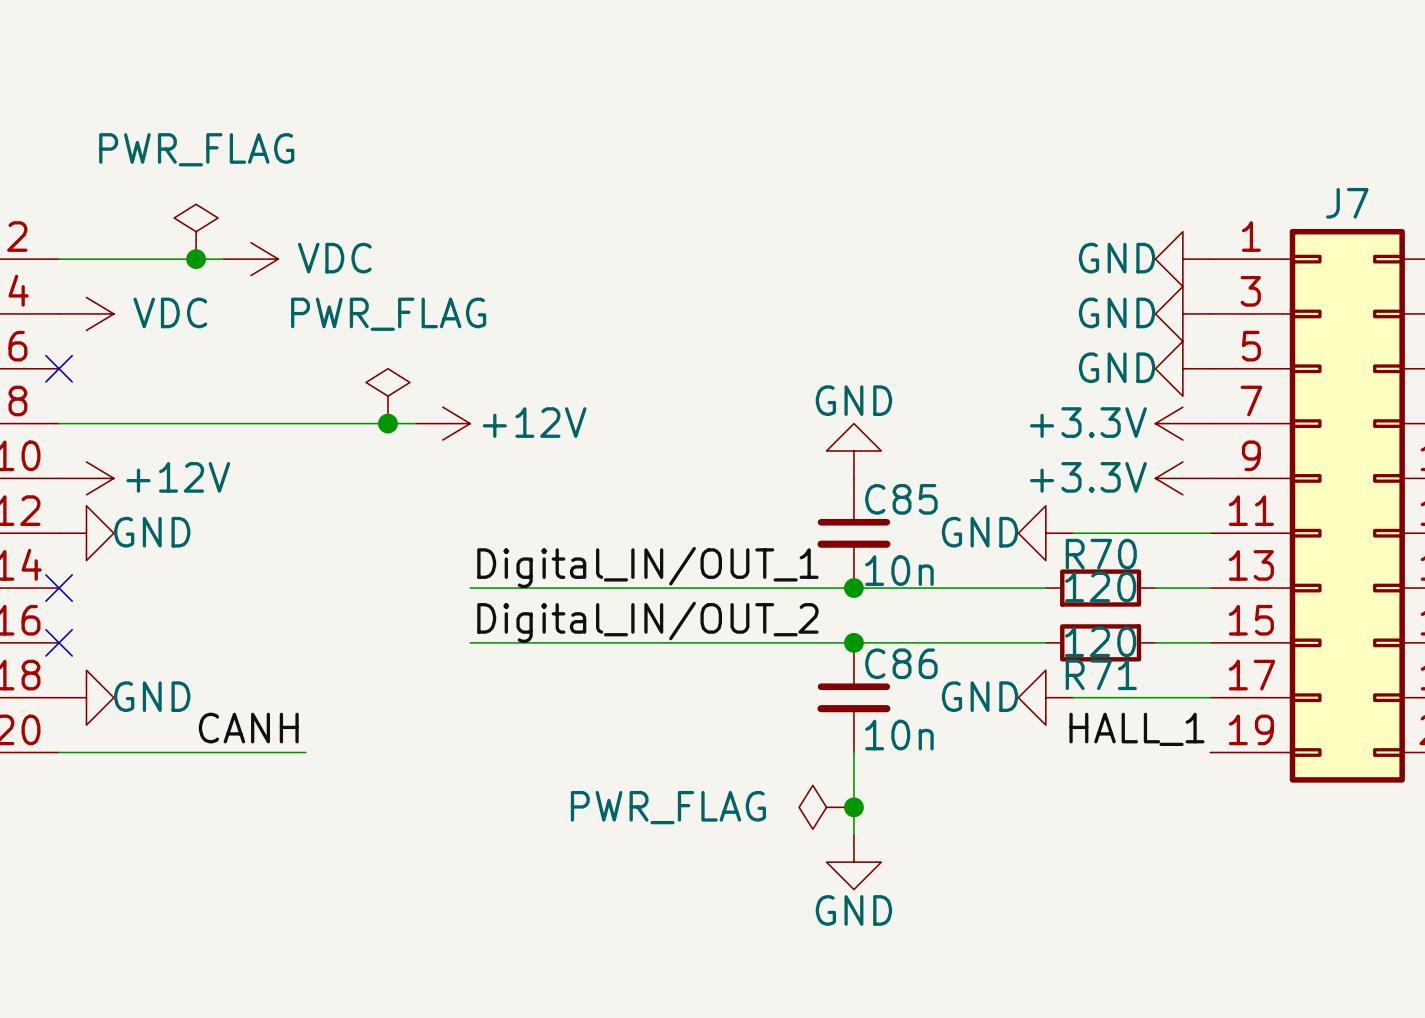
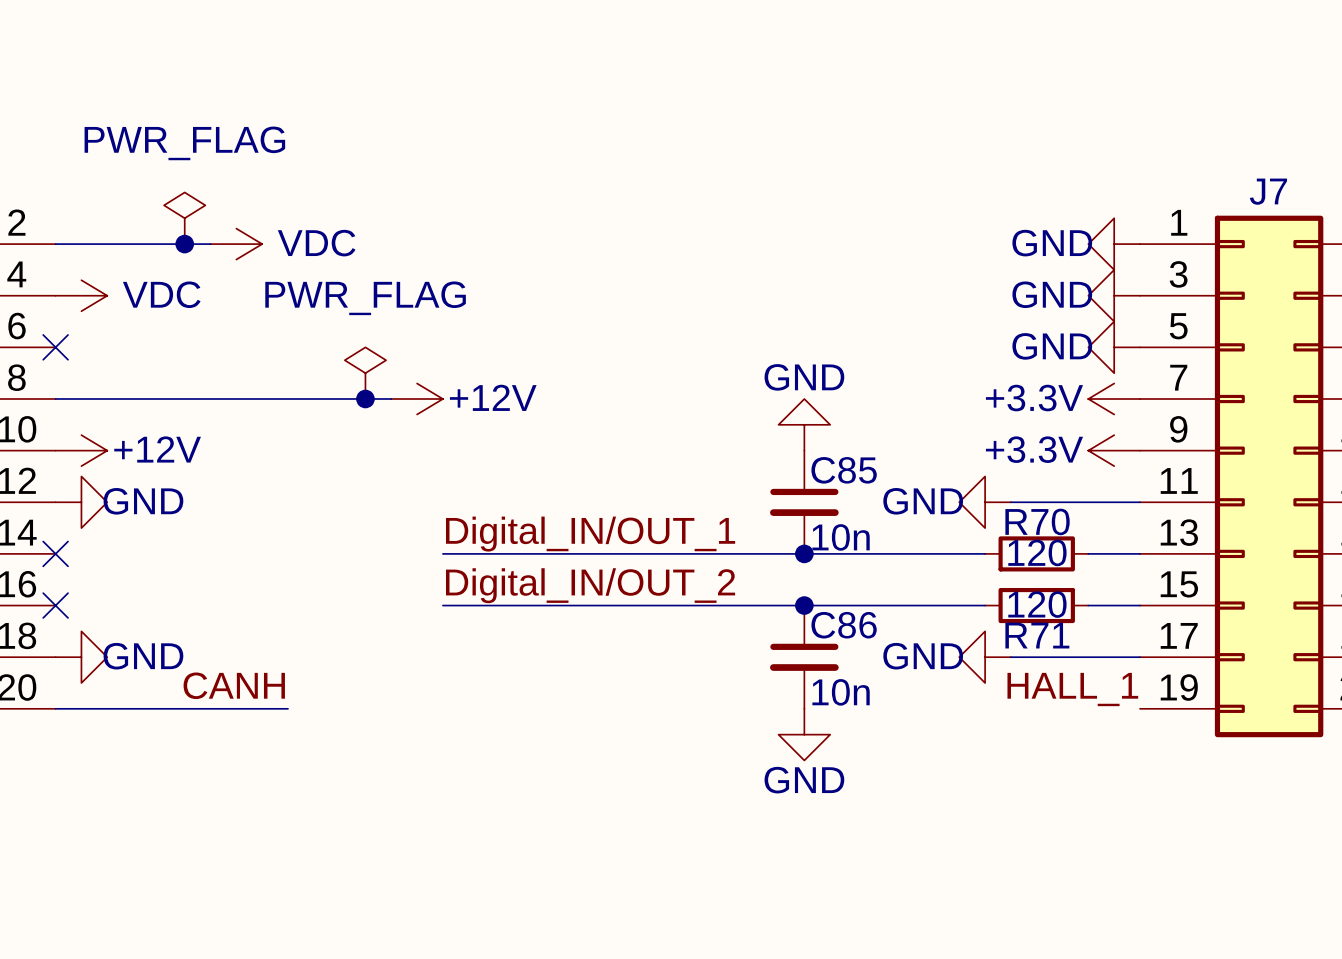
wire: (853, 752) (853, 834) -> none
power symbol: PWR_FLAG (826, 807) -> none
junction: (853, 807) -> none
power symbol position: GND (853, 862) -> GND (804, 734)

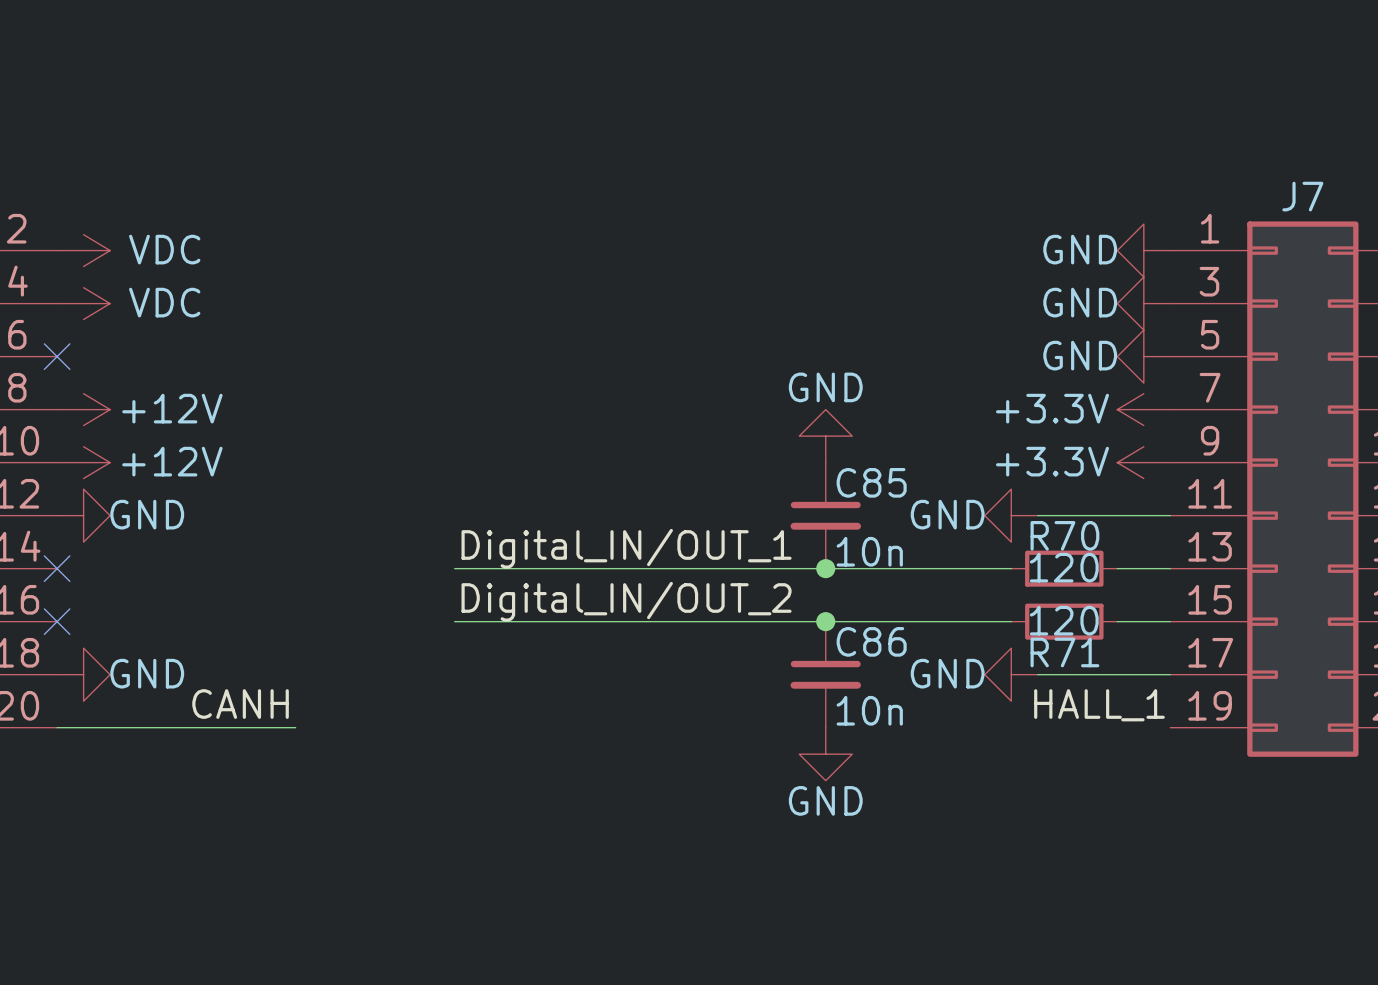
power symbol: PWR_FLAG (184, 218) -> none
wire: (55, 244) (210, 244) -> none
junction: (184, 244) -> none
power symbol position: VDC (236, 244) -> VDC (83, 250)
power symbol: PWR_FLAG (365, 373) -> none
wire: (55, 399) (391, 399) -> none
junction: (365, 399) -> none
power symbol position: +12V (417, 399) -> +12V (83, 409)

